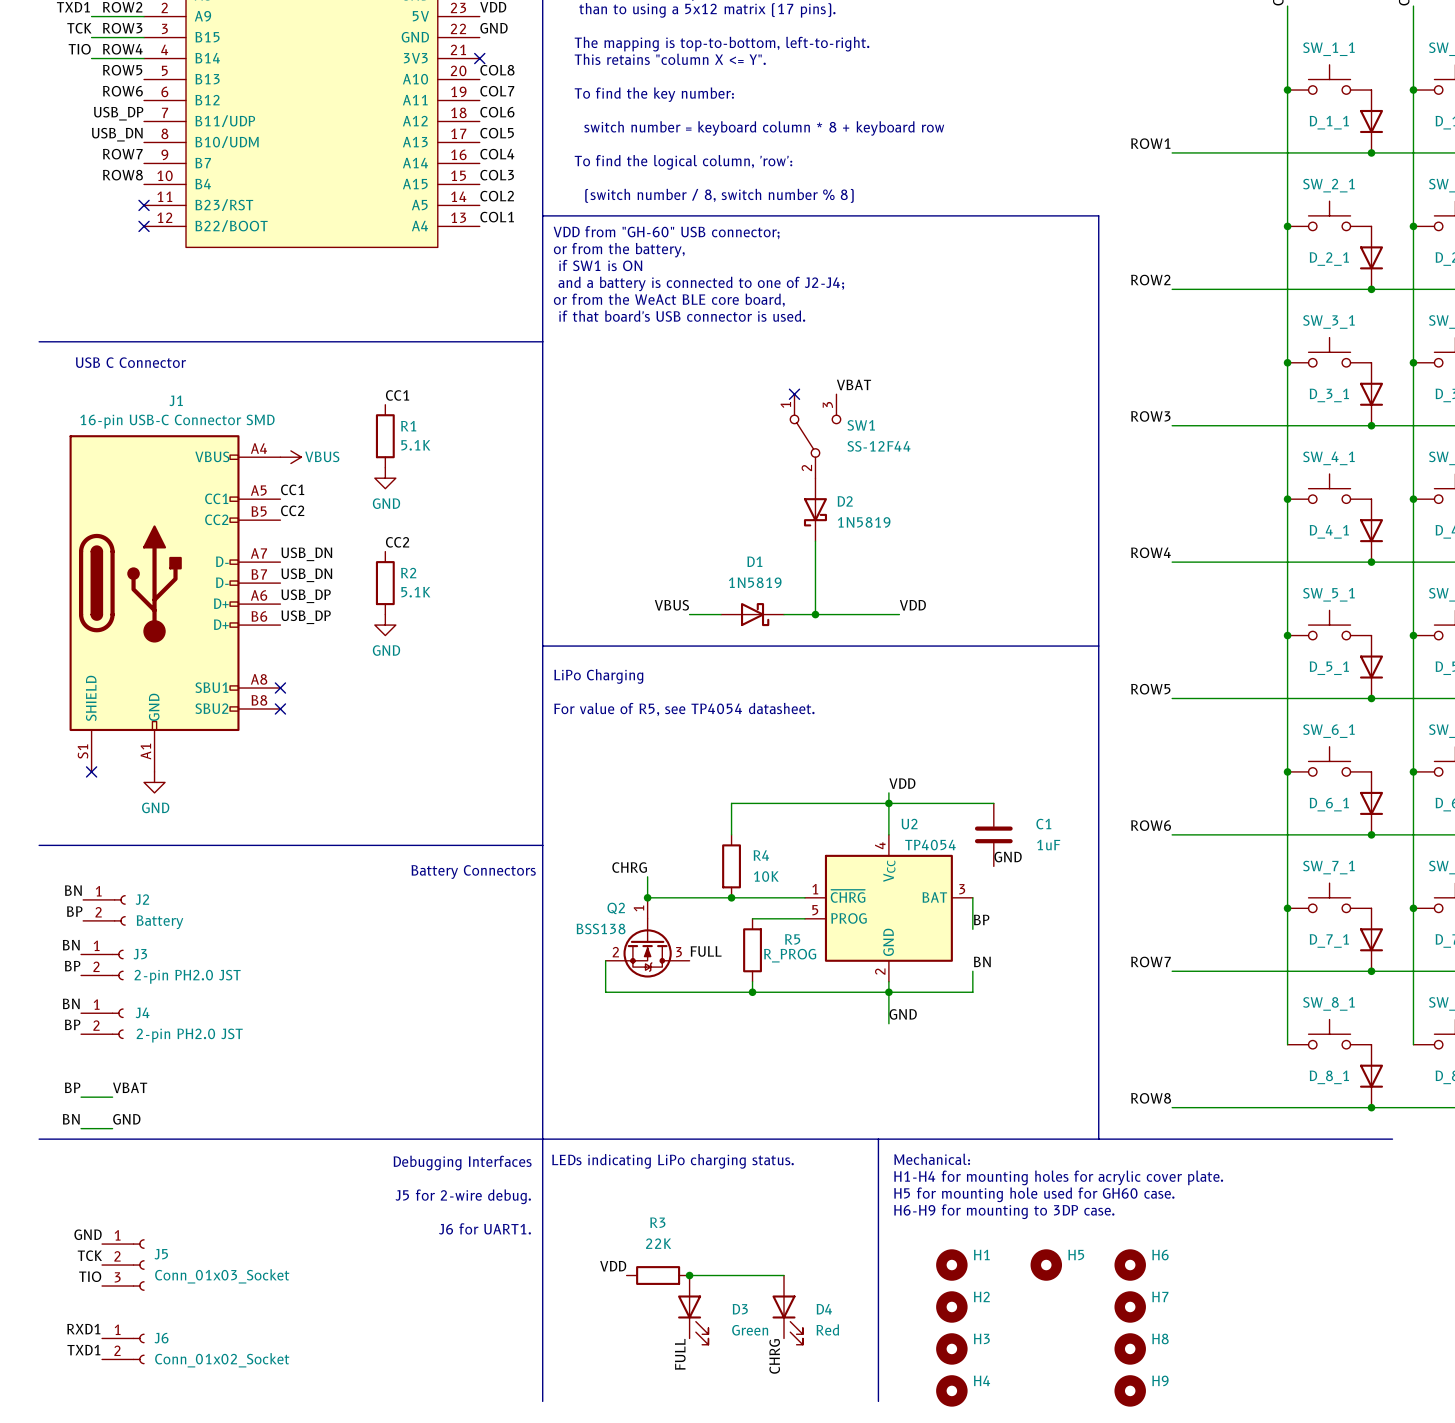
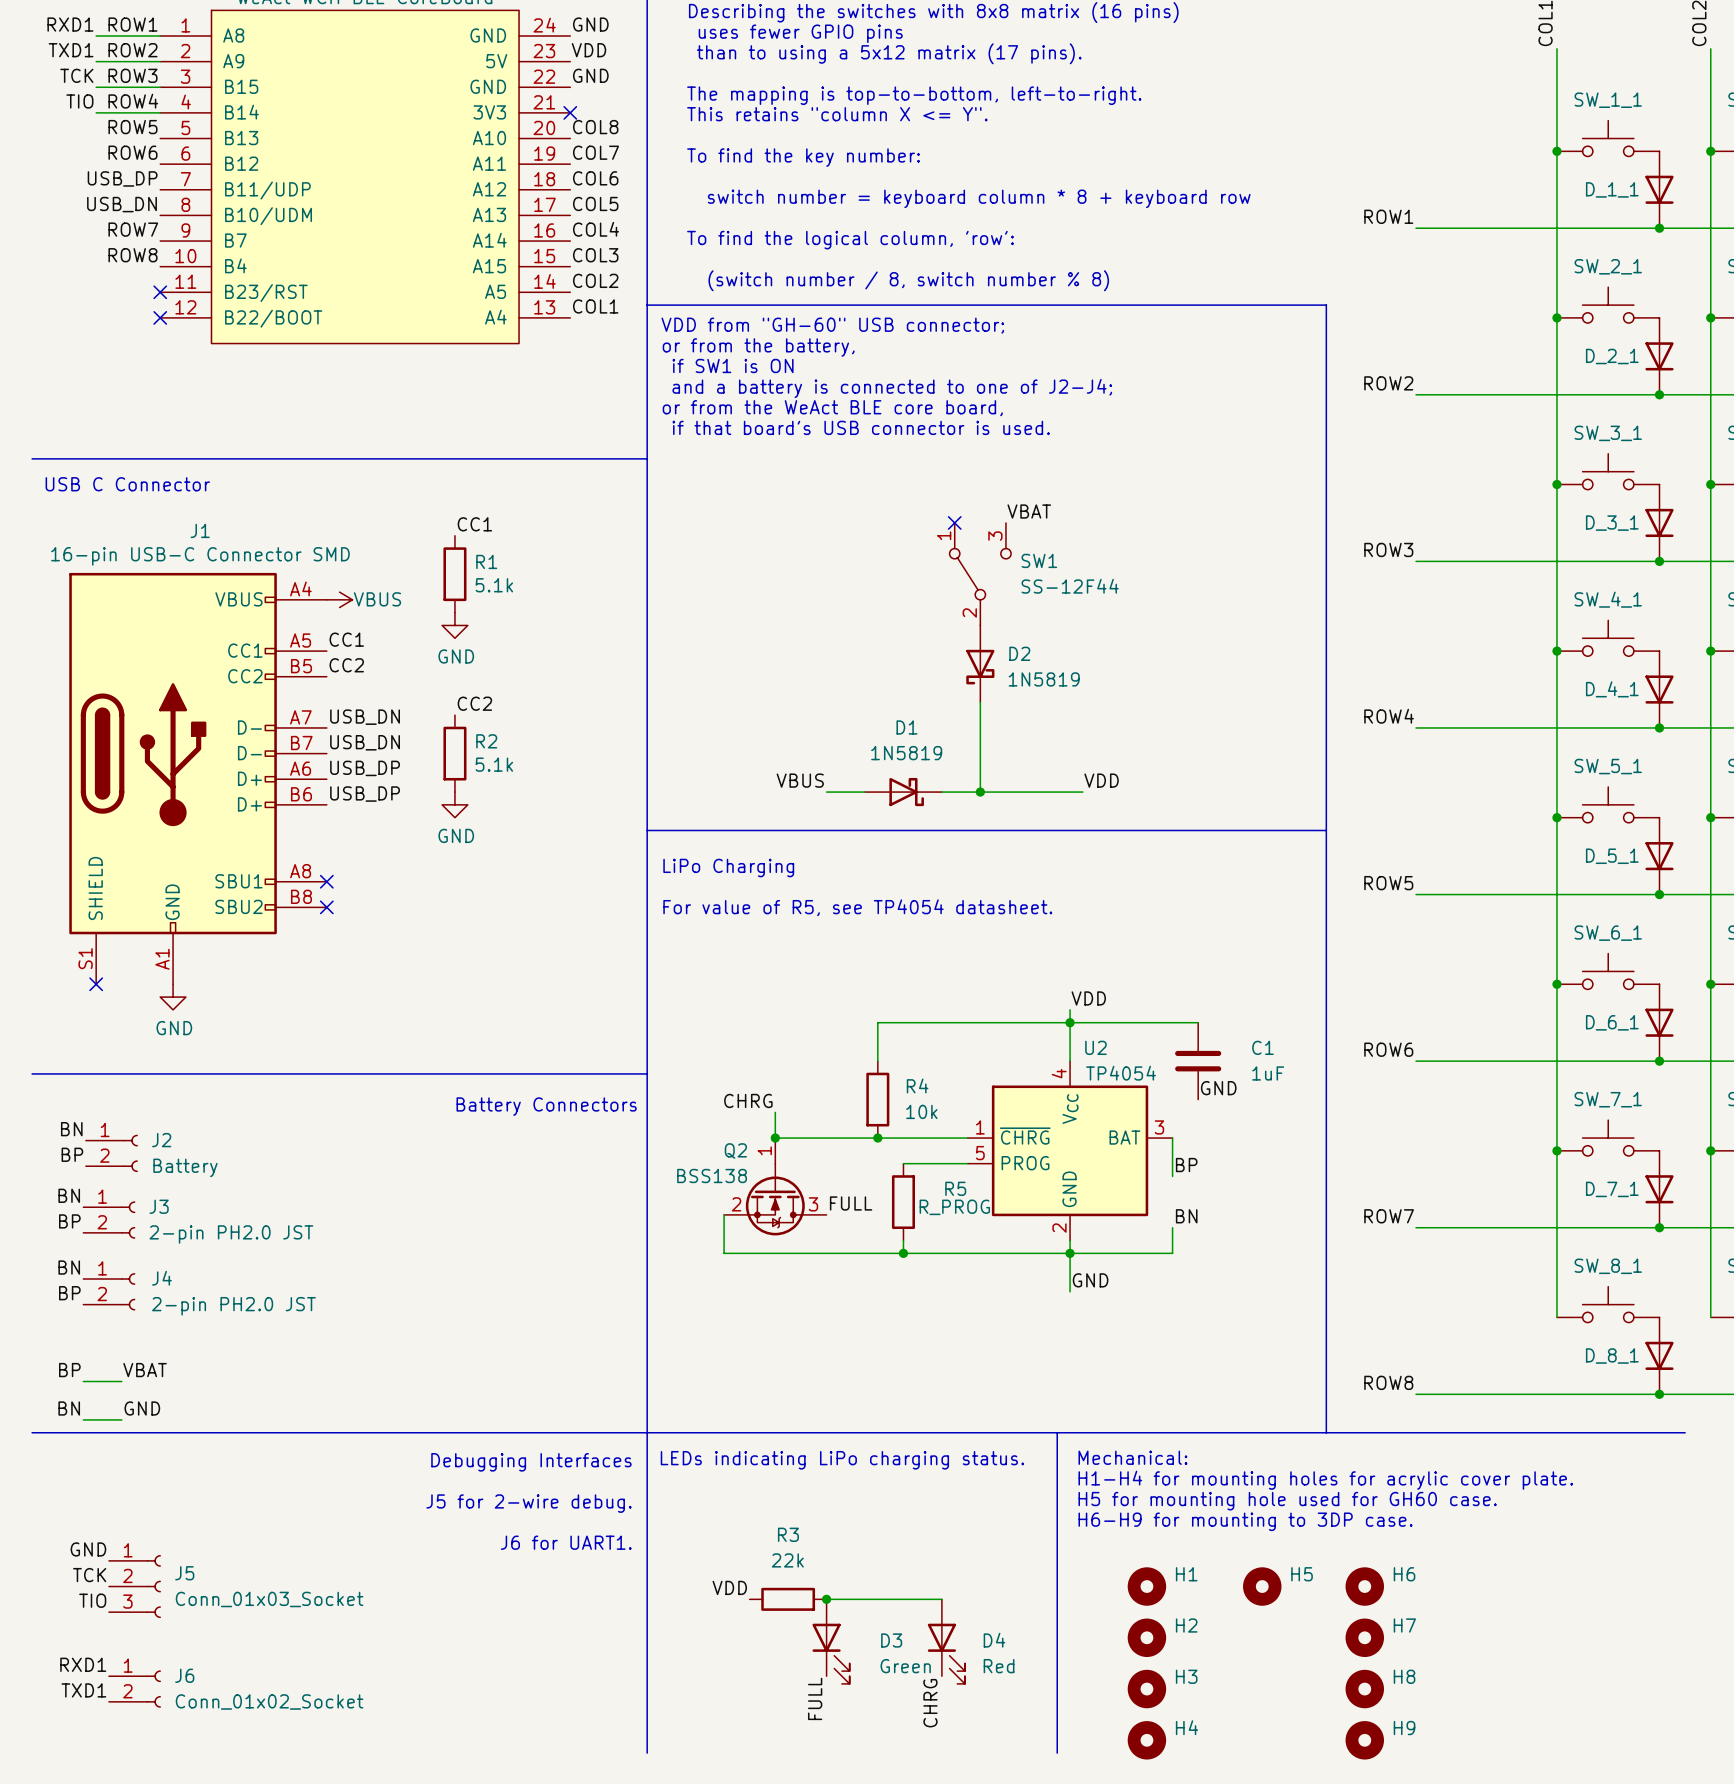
R1 value: 5.1K (415, 445) -> 5.1k (494, 585)
R2 value: 5.1K (415, 592) -> 5.1k (494, 764)
R4 value: 10K (766, 876) -> 10k (921, 1111)
R3 value: 22K (658, 1243) -> 22k (787, 1560)

